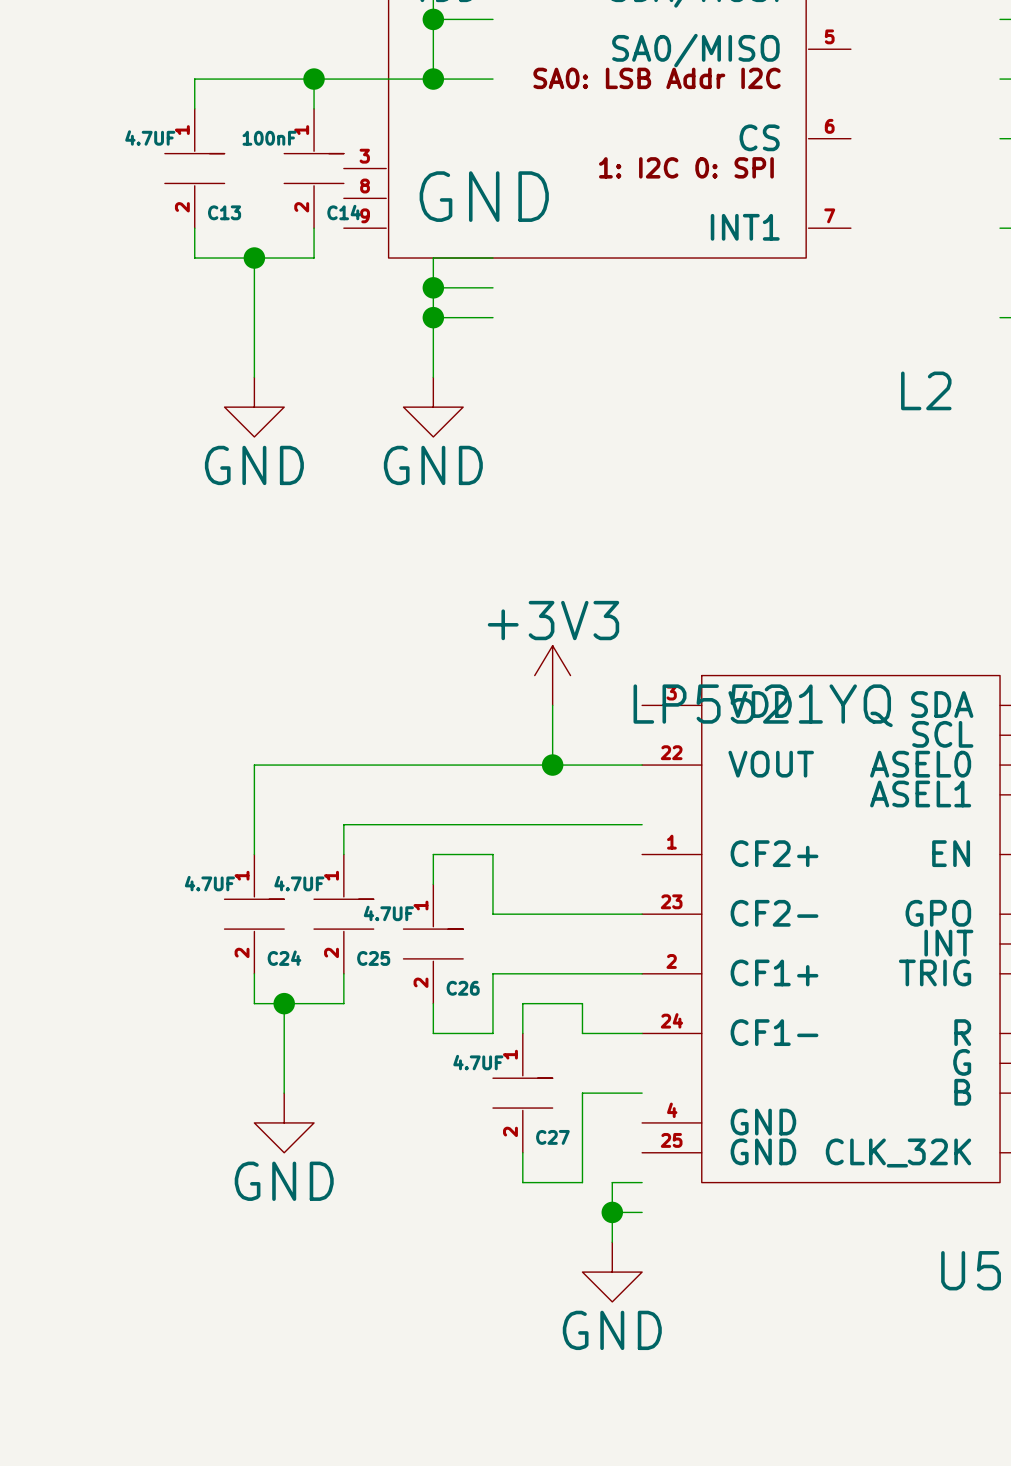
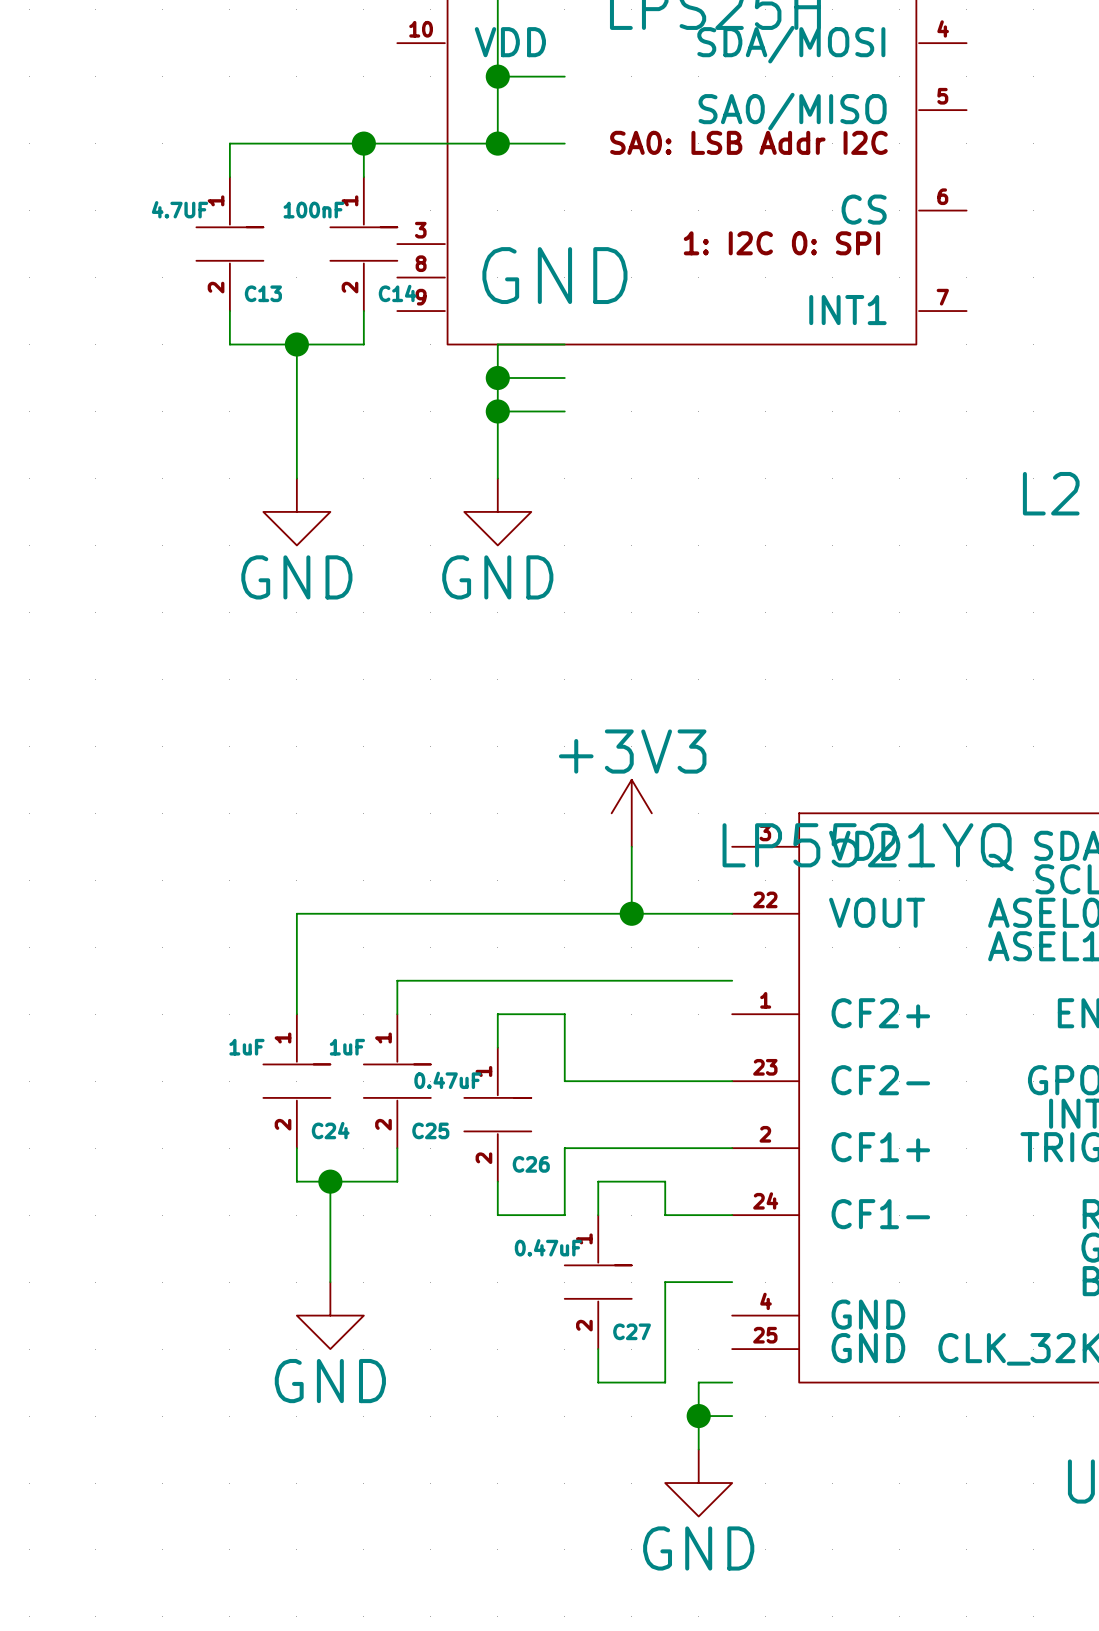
C24 value: 4.7UF (209, 883) -> 1uF (246, 1047)
C25 value: 4.7UF (299, 883) -> 1uF (347, 1047)
C26 value: 4.7UF (388, 913) -> 0.47uF (447, 1080)
C27 value: 4.7UF (478, 1062) -> 0.47uF (548, 1247)

